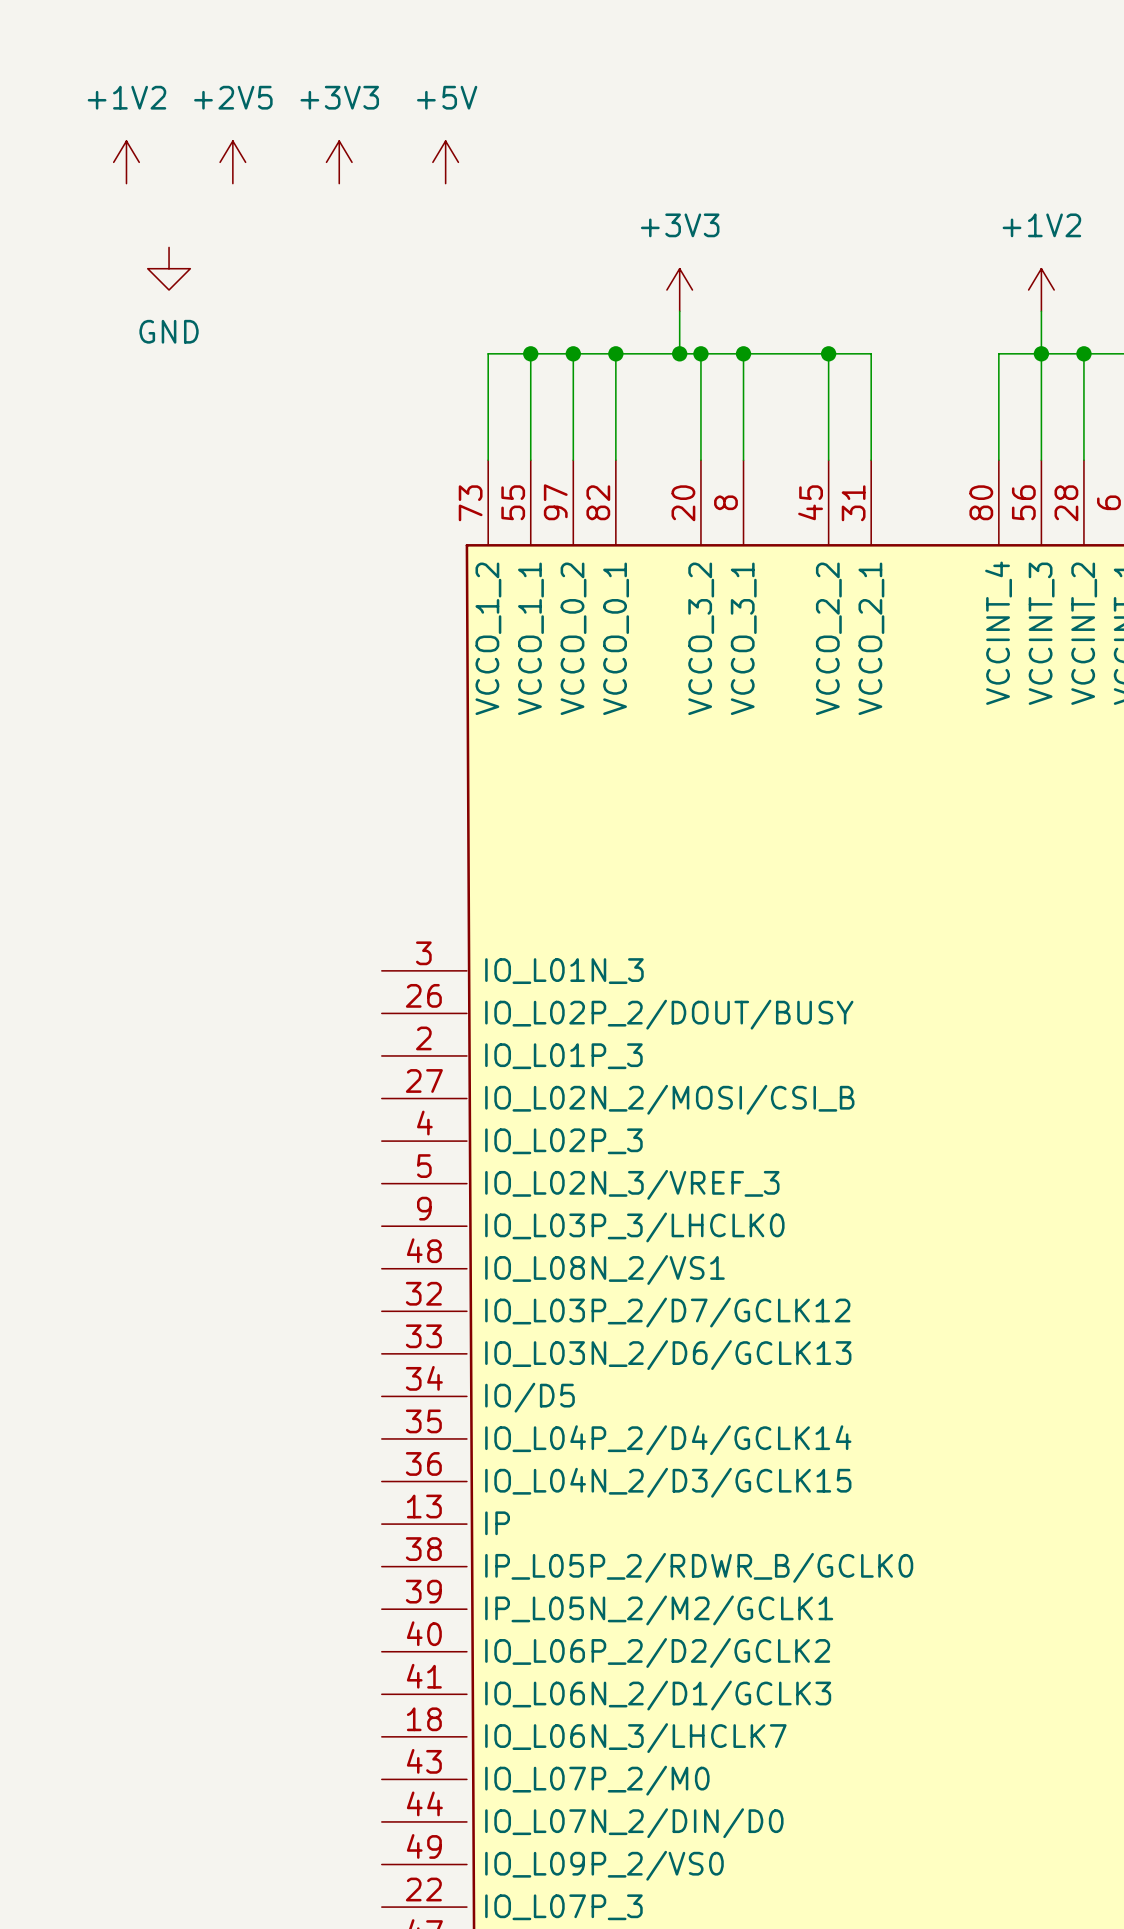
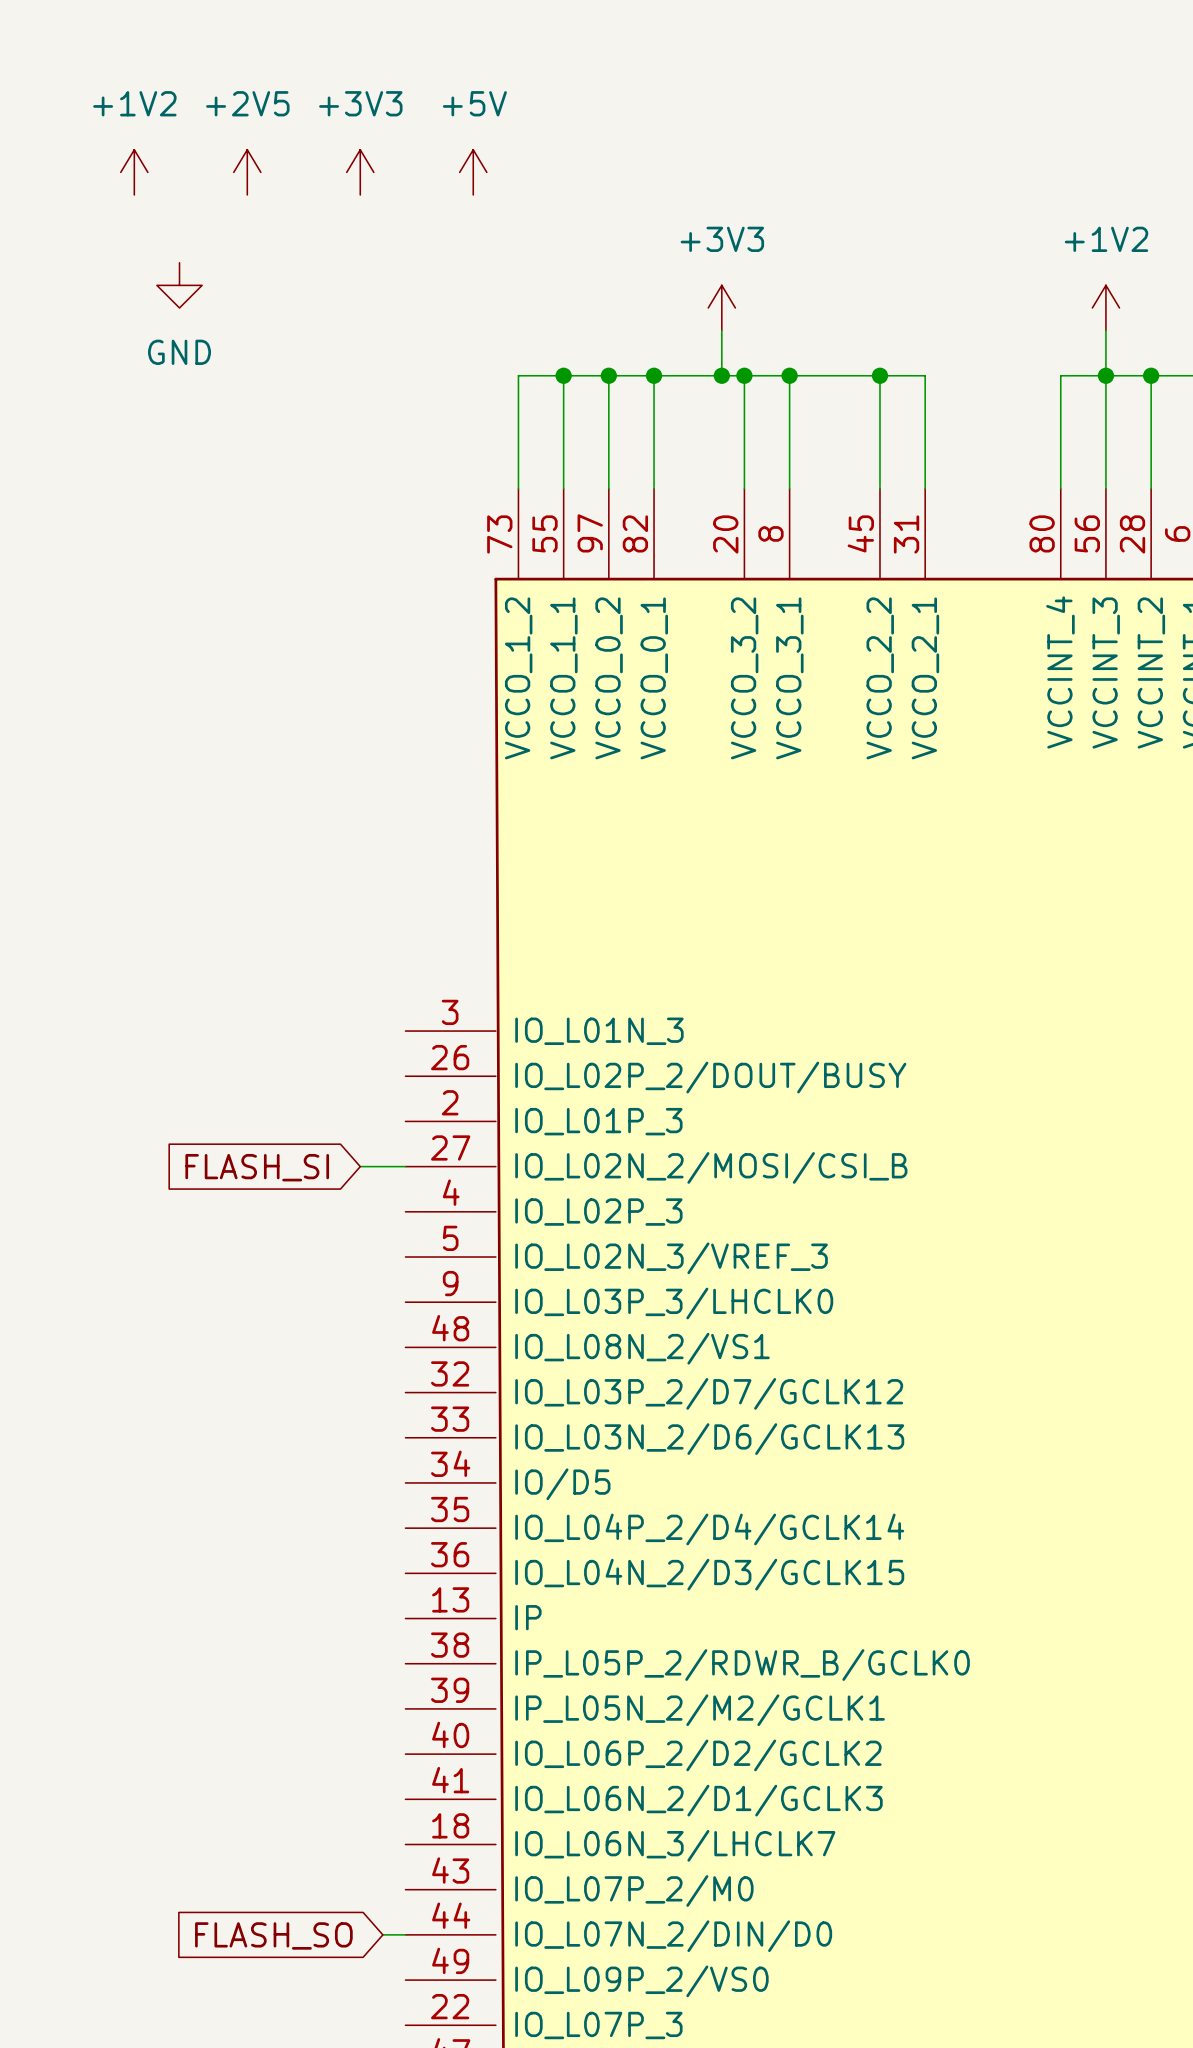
wire: none -> (360, 1166) (405, 1166)
global label: none -> FLASH_SI (257, 1167)
wire: none -> (382, 1934) (405, 1934)
global label: none -> FLASH_SO (273, 1935)

